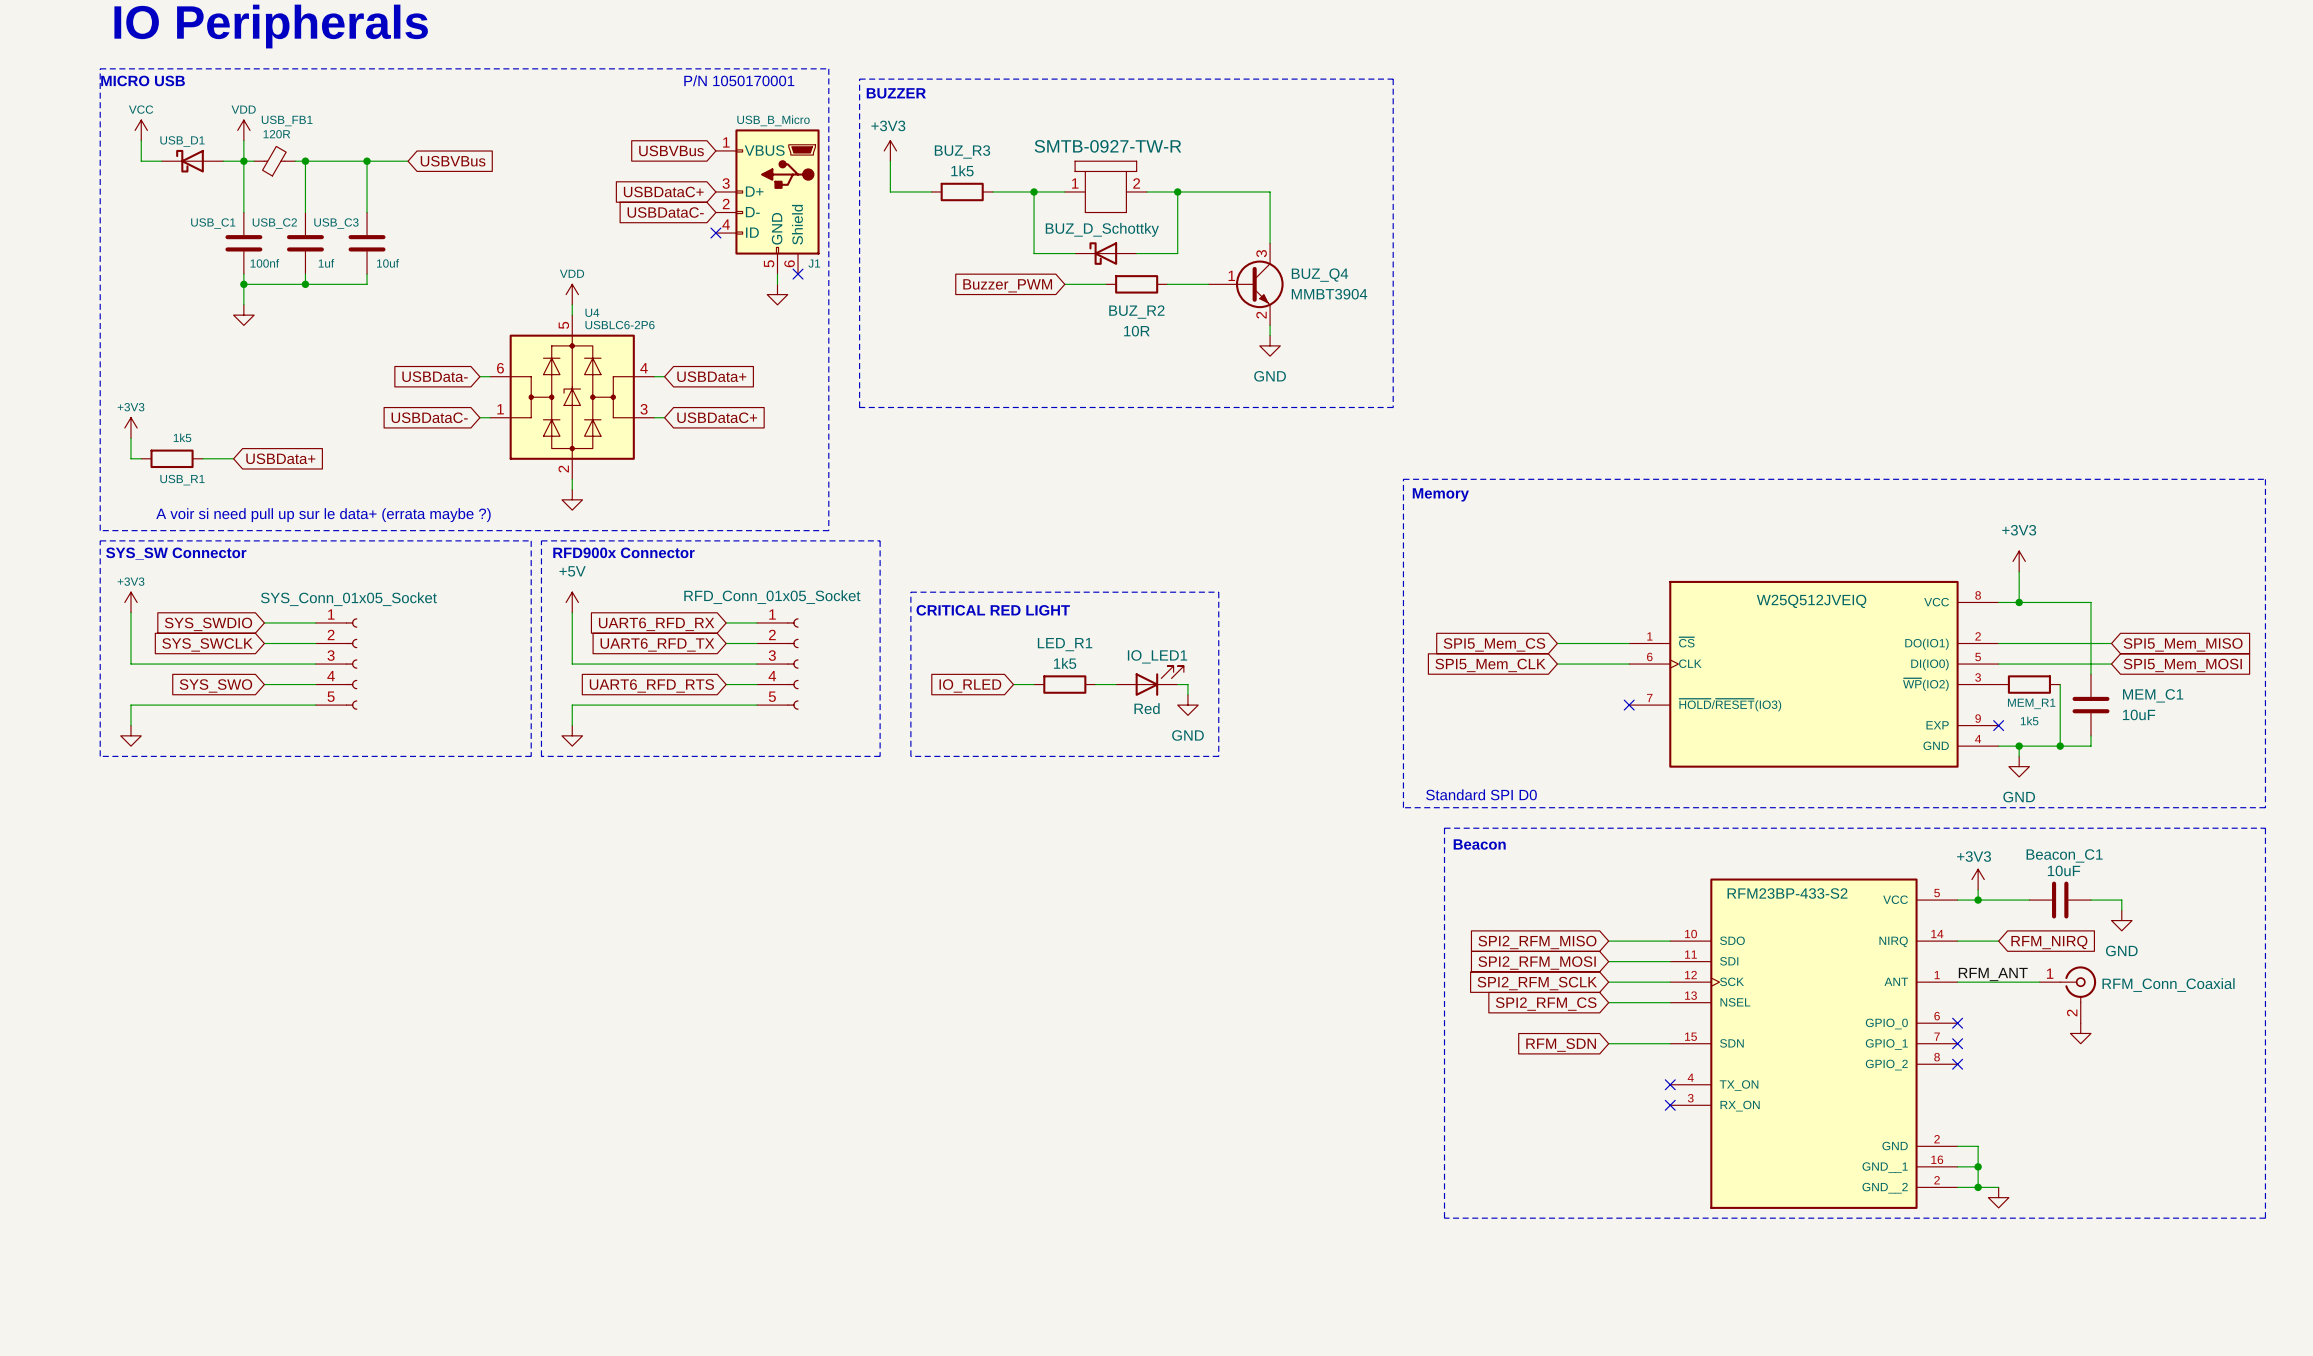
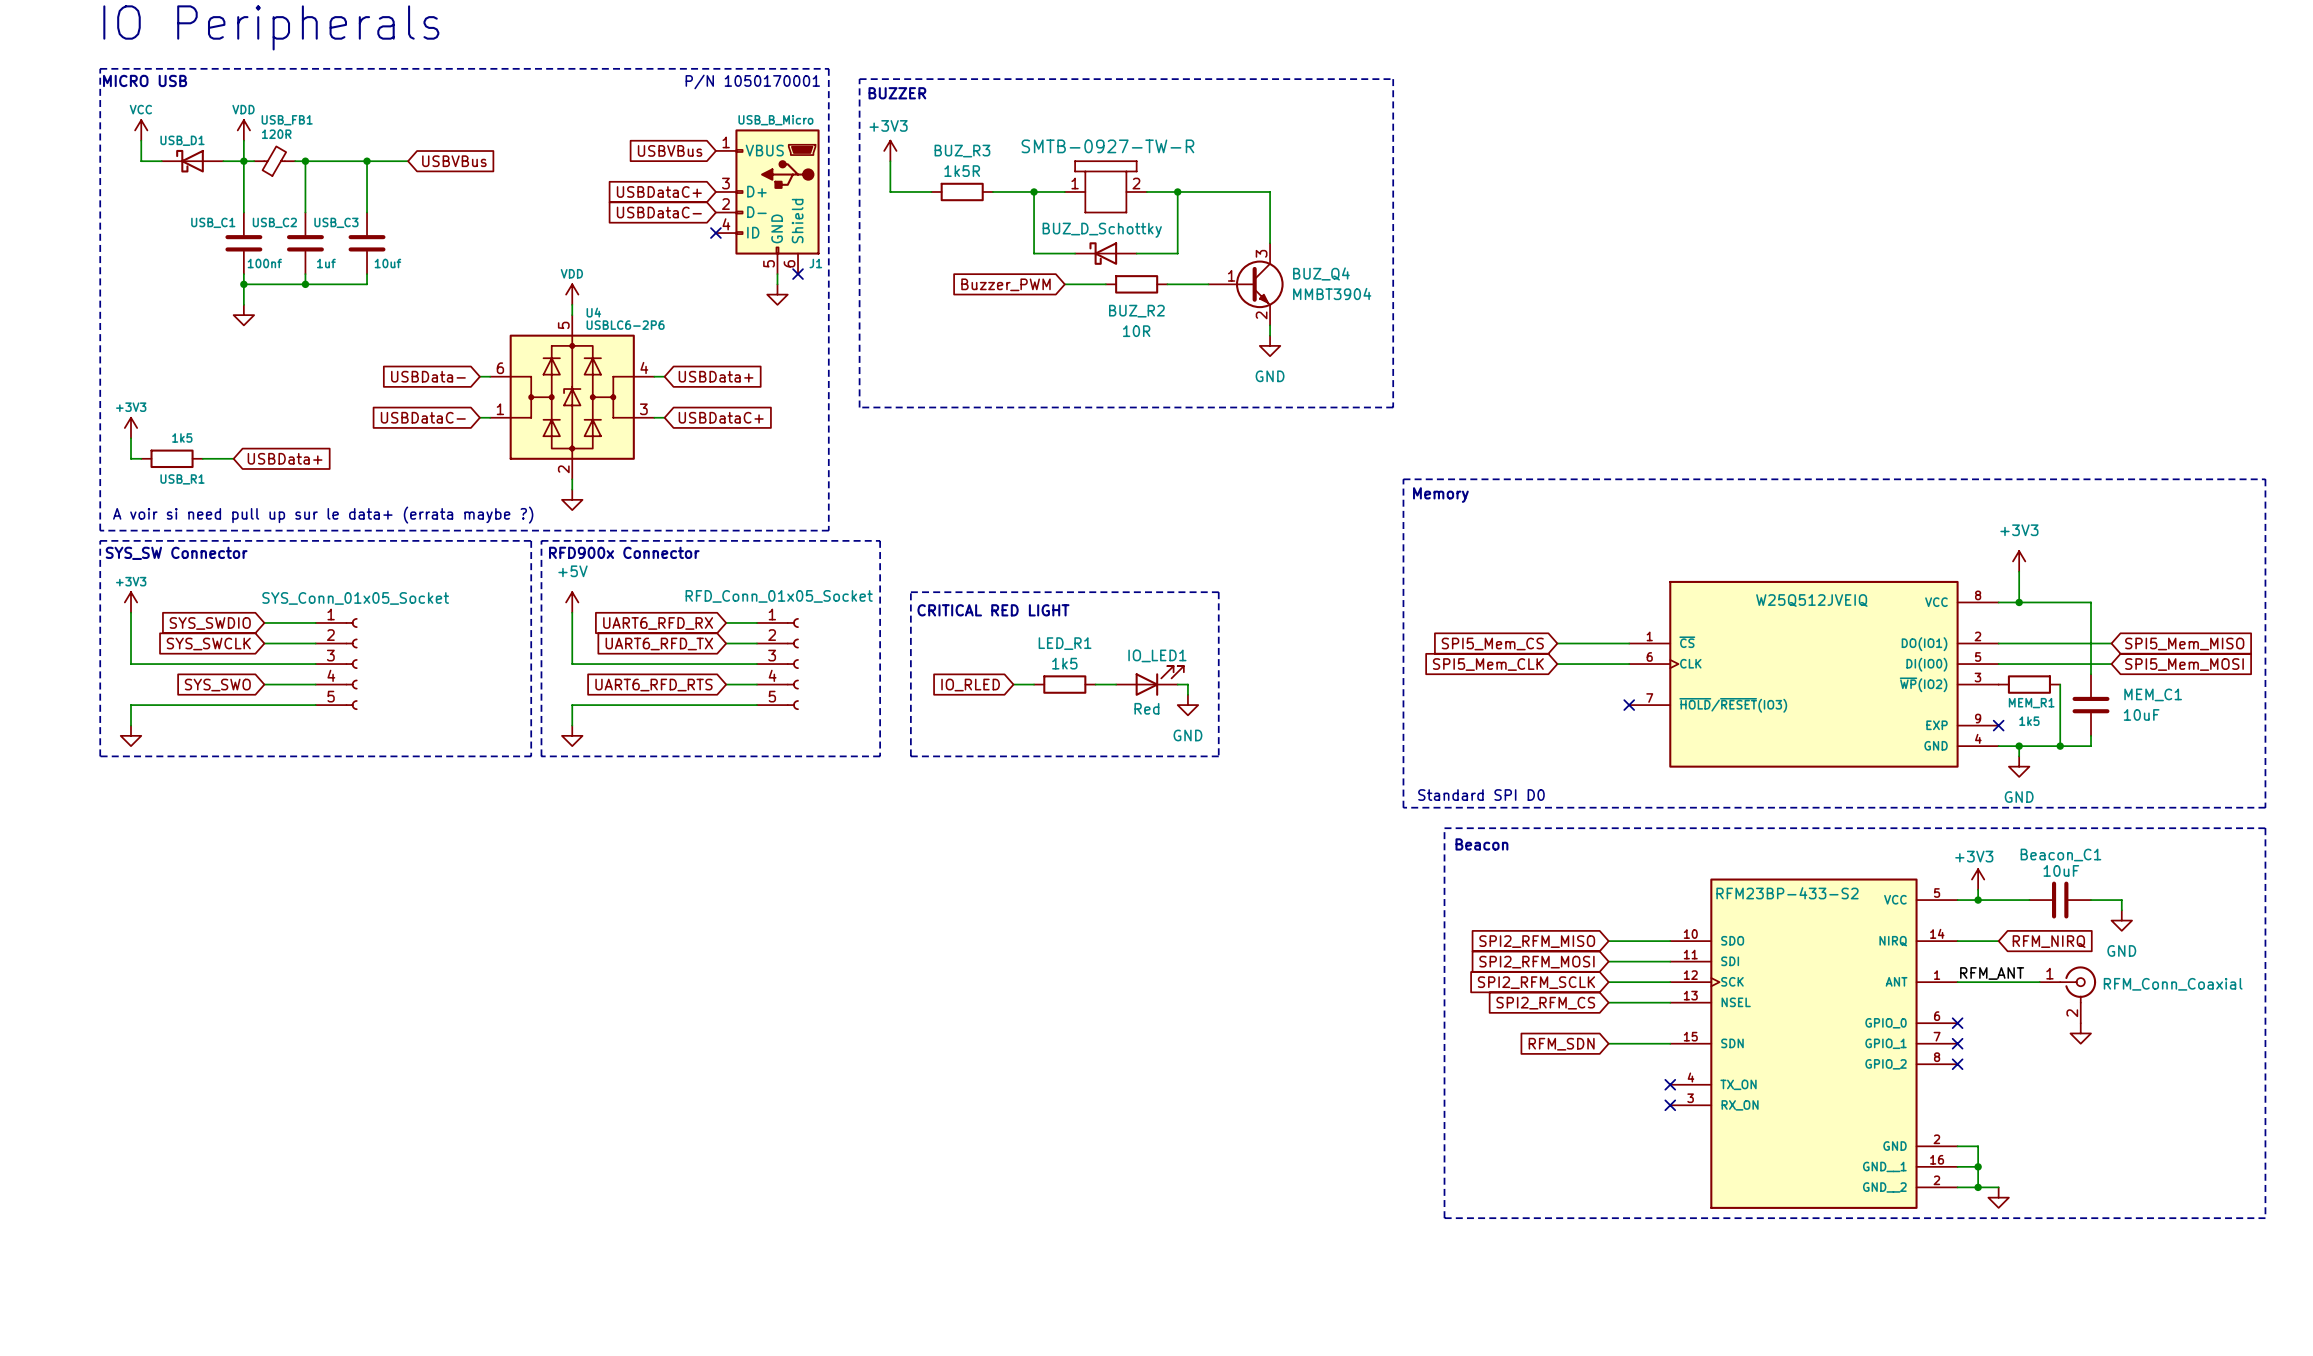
BUZ_R3 value: 1k5 (962, 170) -> 1k5R (962, 171)

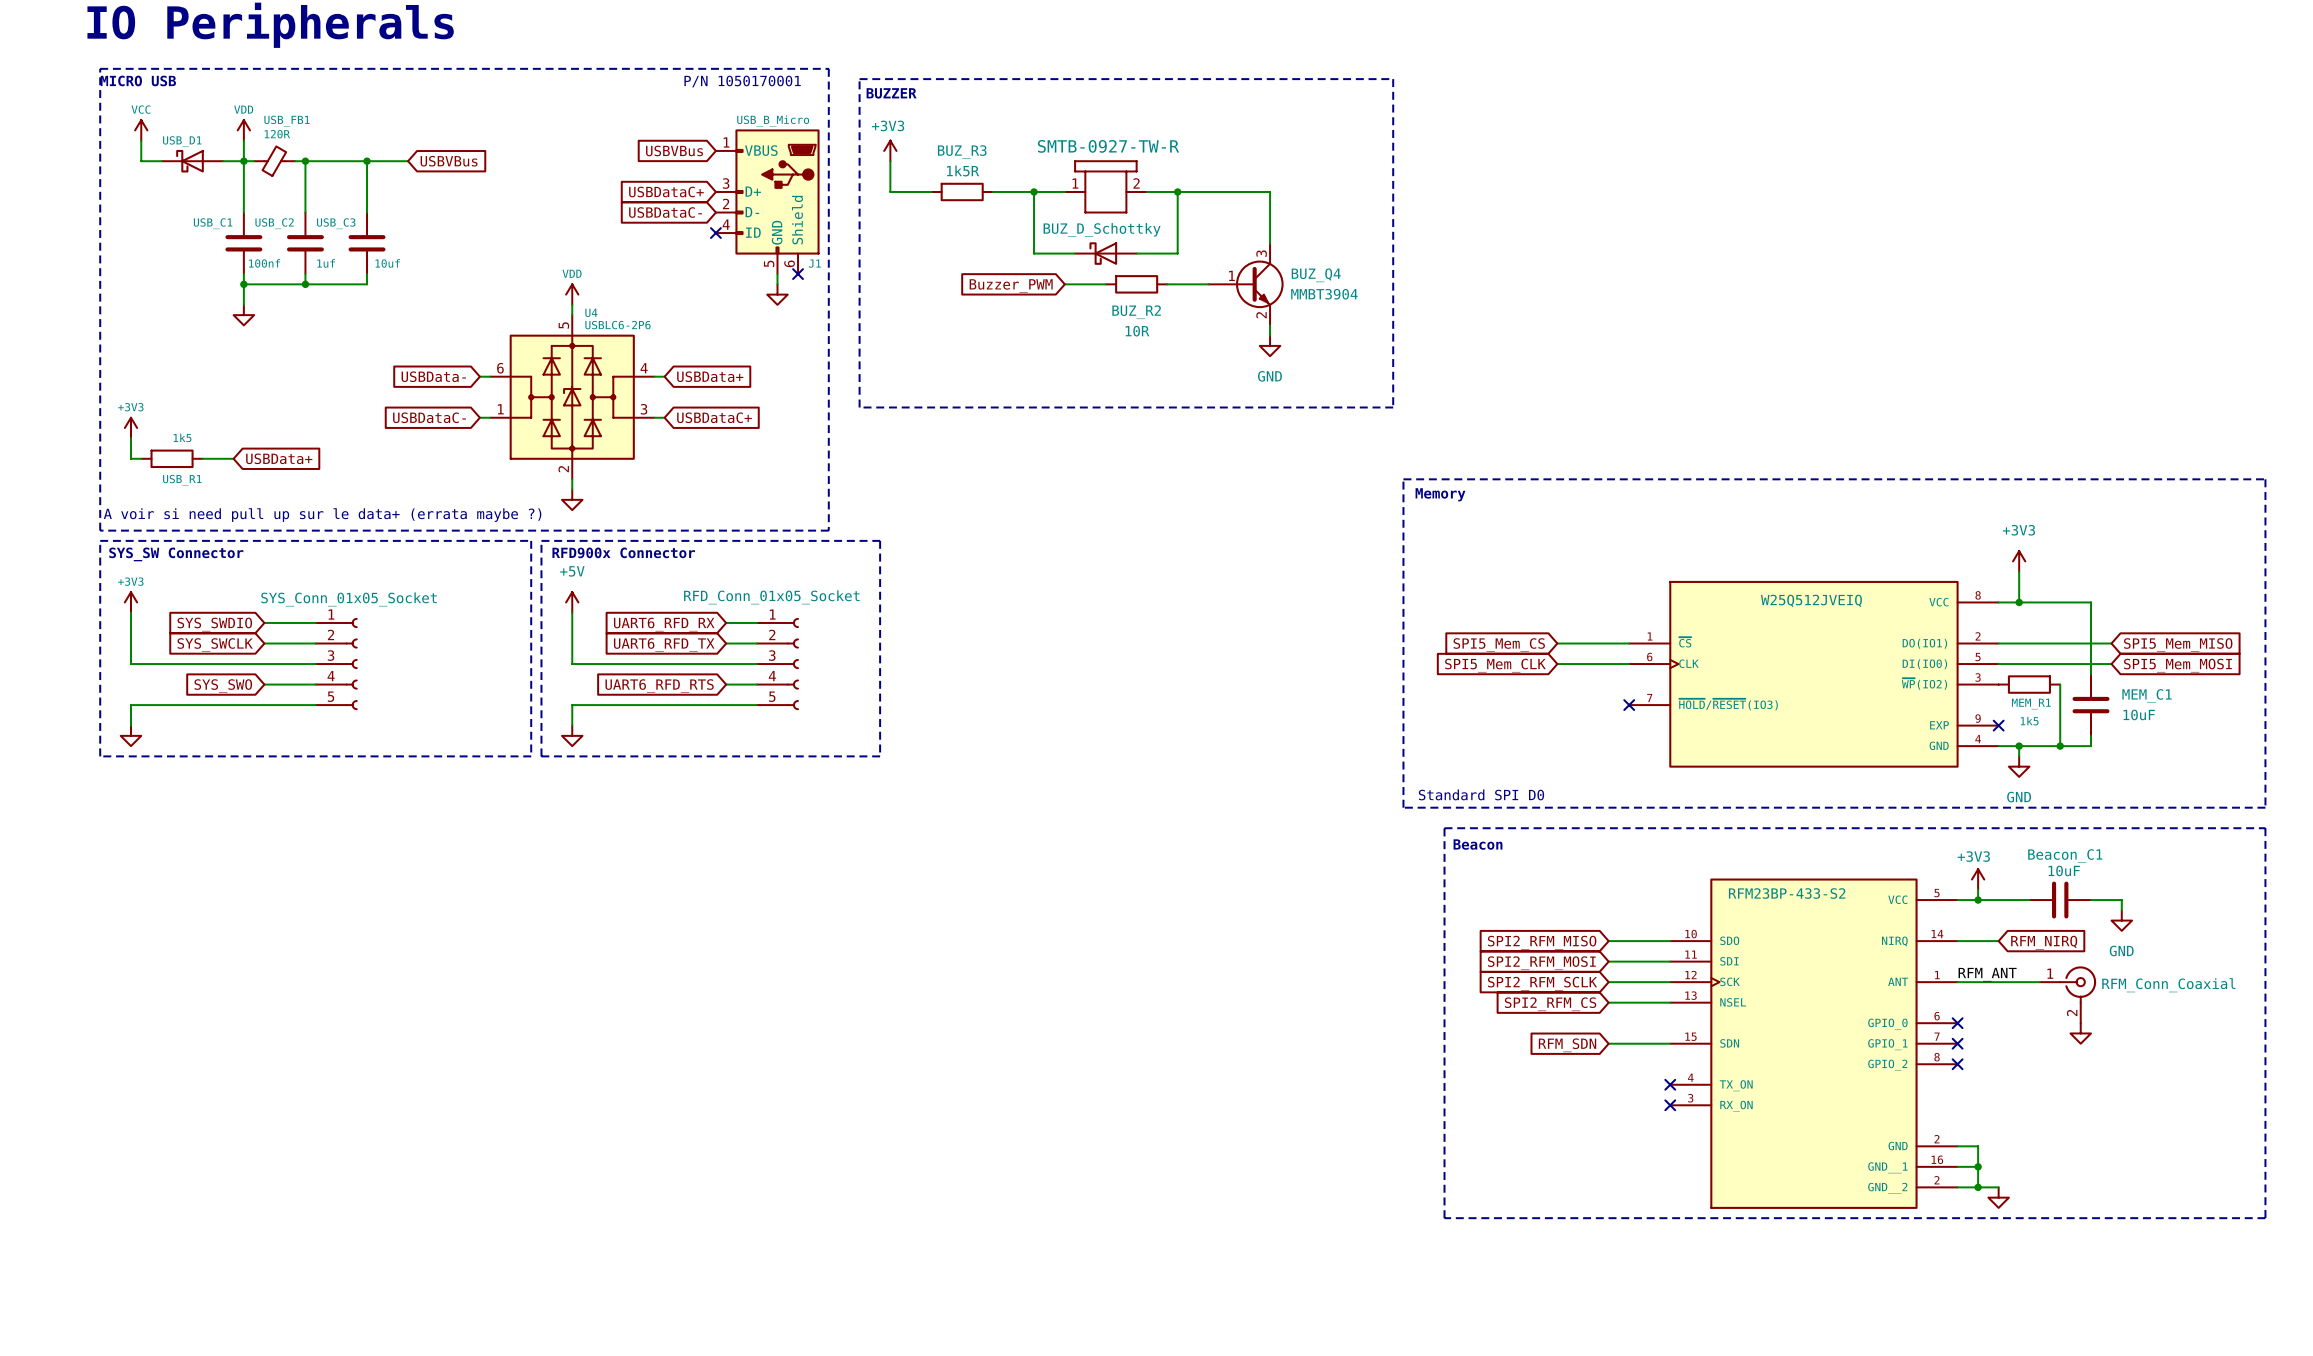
line: (910, 592) (1218, 592) (1218, 756) (910, 756) (910, 592) -> none
text: CRITICAL RED LIGHT (993, 610) -> none
IO_LED1: Red (1149, 680) -> none
wire: (1013, 684) (1034, 684) -> none
LED_R1: 1k5 (1064, 684) -> none
wire: (1095, 684) (1116, 684) -> none
wire: (1177, 684) (1187, 684) (1187, 694) -> none
global label: IO_RLED (970, 685) -> none
power symbol: GND (1187, 705) -> none

